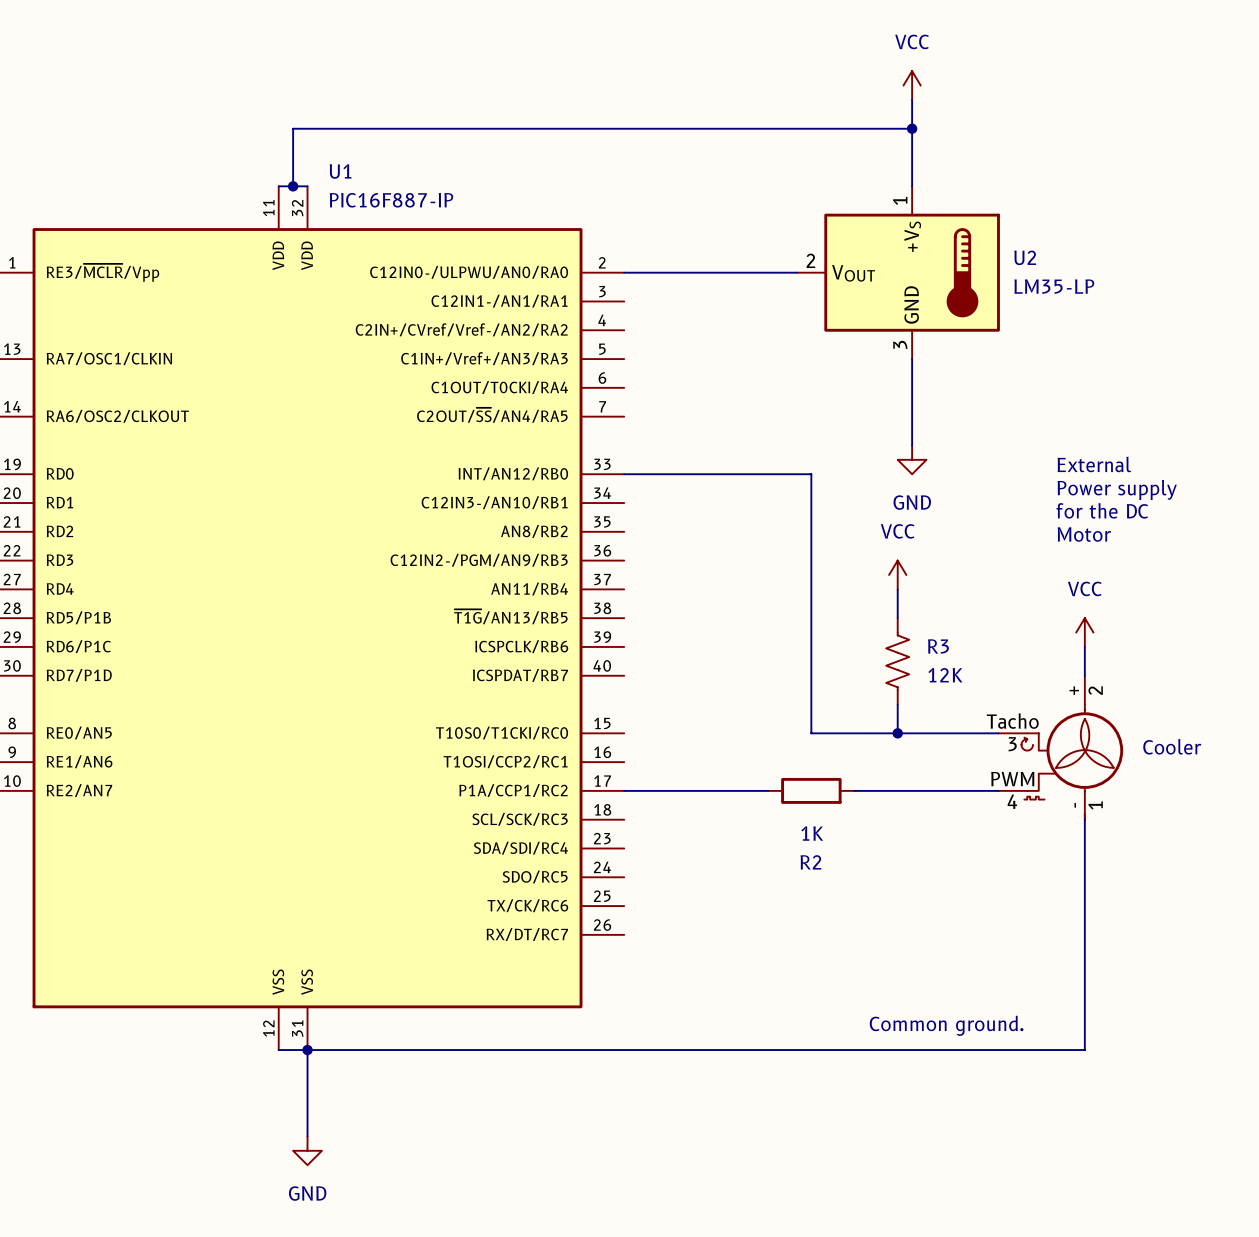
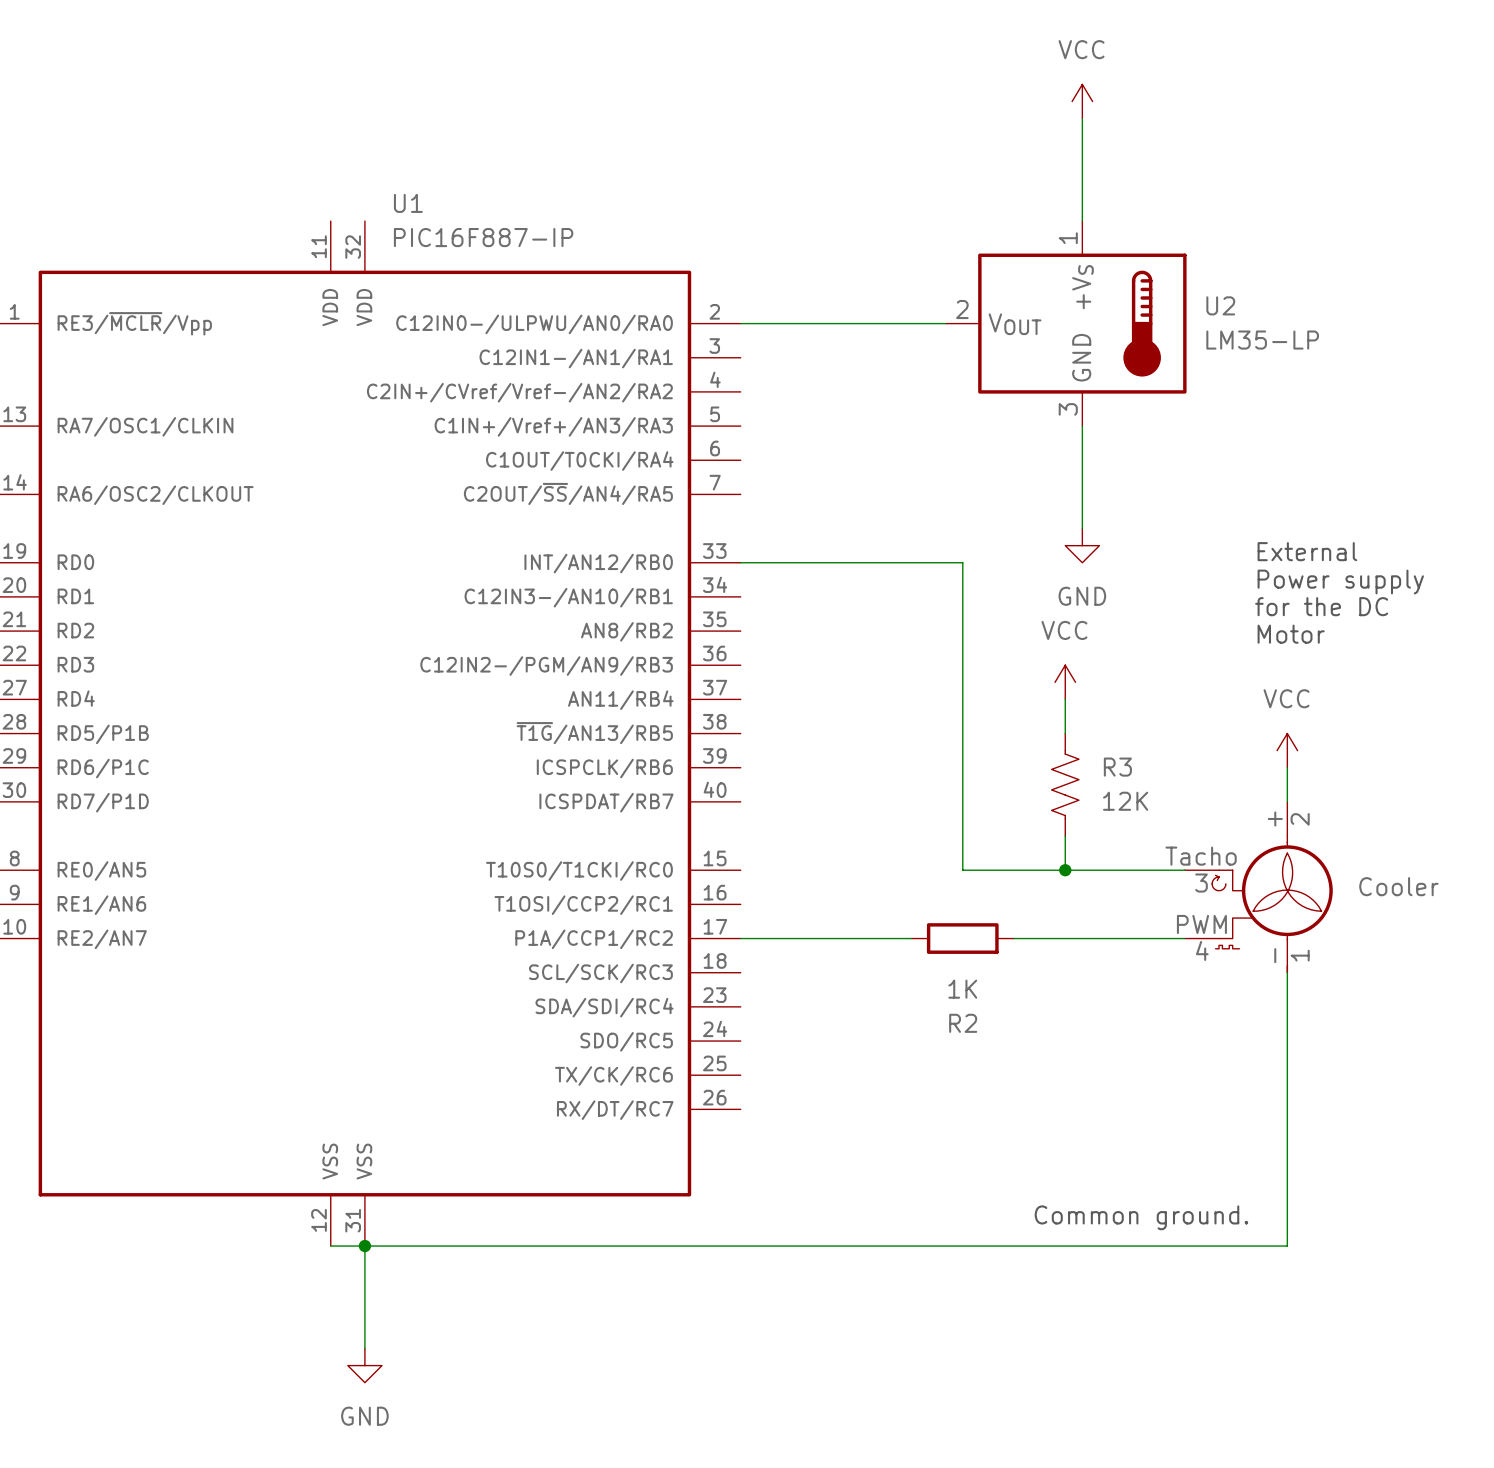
wire: (912, 128) (293, 128) (293, 186) -> none
junction: (912, 128) -> none
wire: (278, 186) (307, 186) -> none
junction: (293, 186) -> none

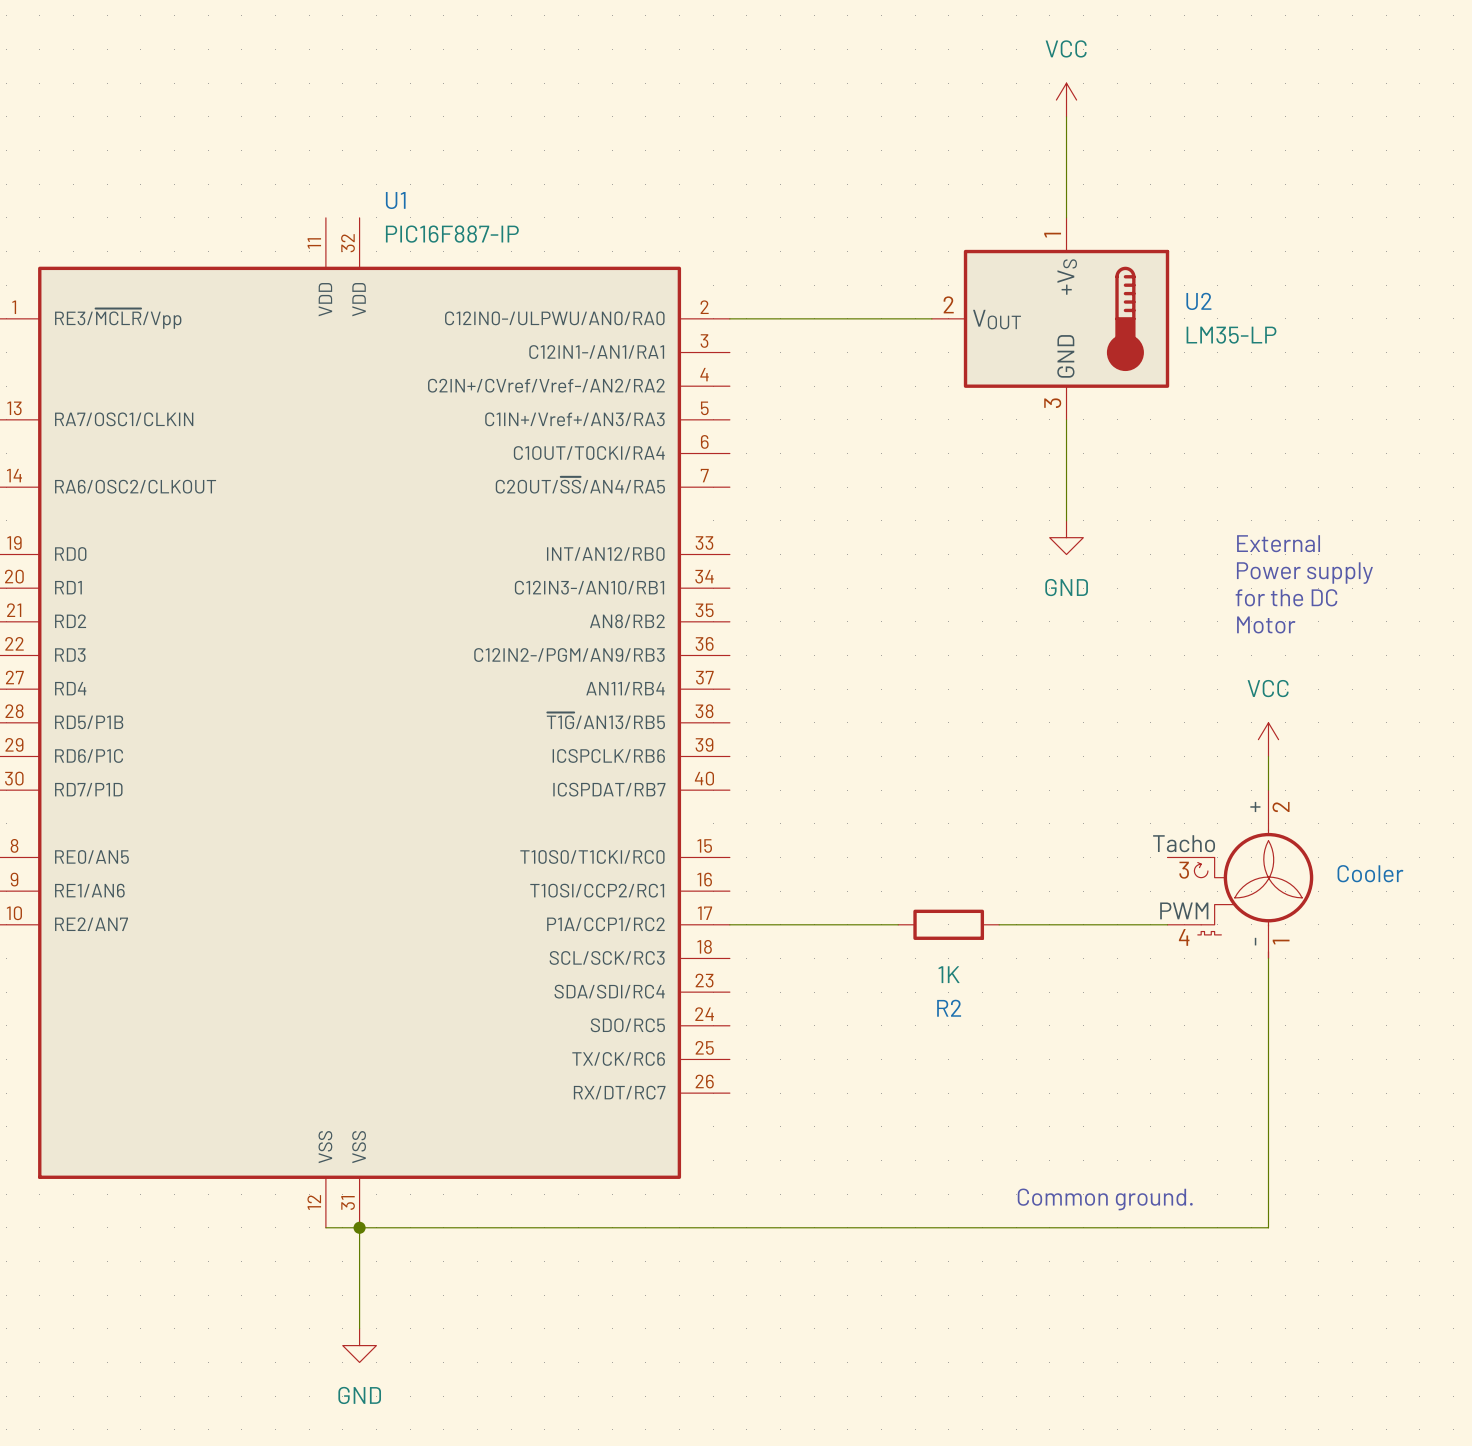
wire: (740, 562) (962, 562) (962, 870) (1184, 870) -> none
power symbol: VCC (1065, 682) -> none
wire: (1065, 699) (1065, 733) -> none
R3: 12K (1065, 784) -> none
wire: (1065, 836) (1065, 870) -> none
junction: (1065, 870) -> none

